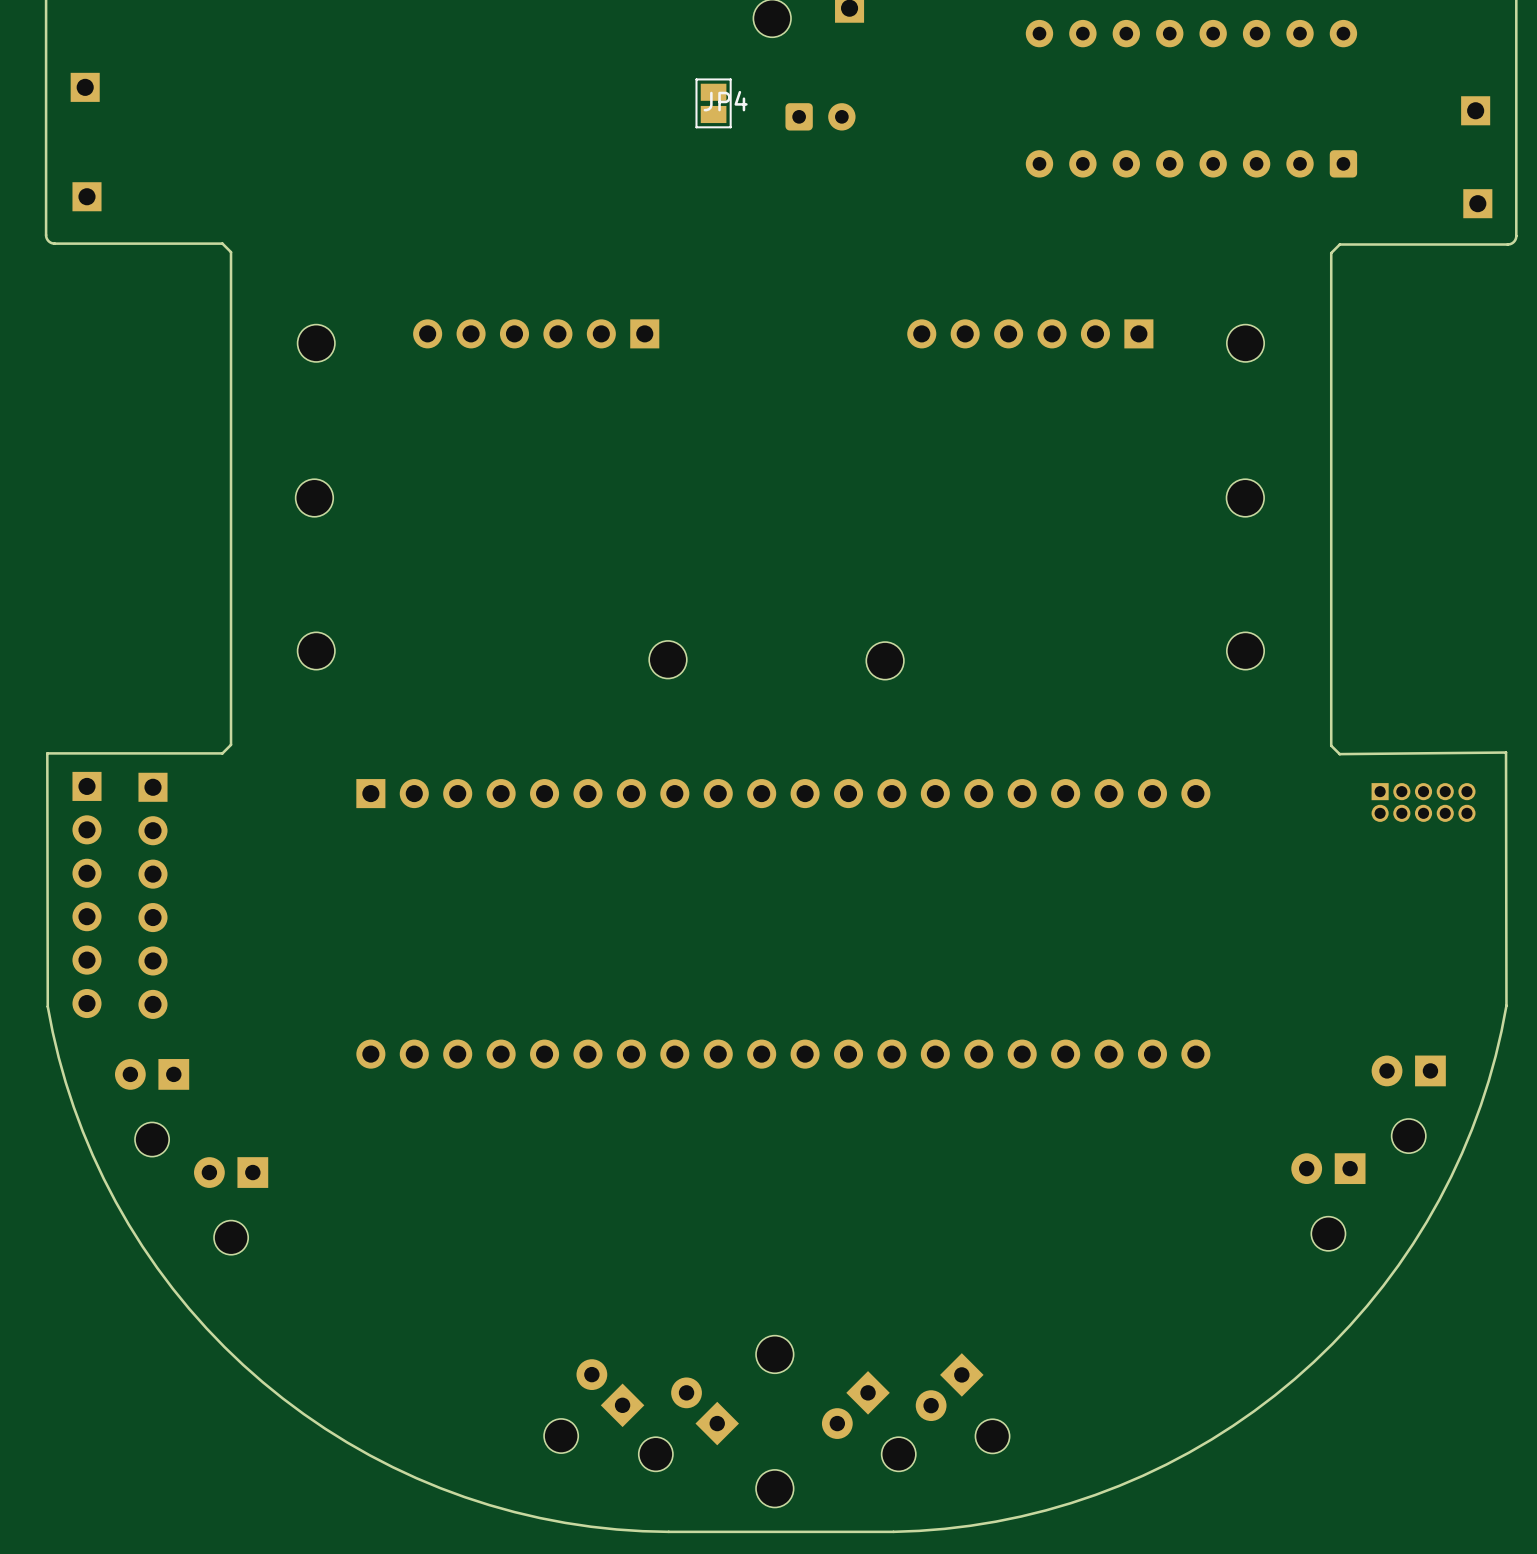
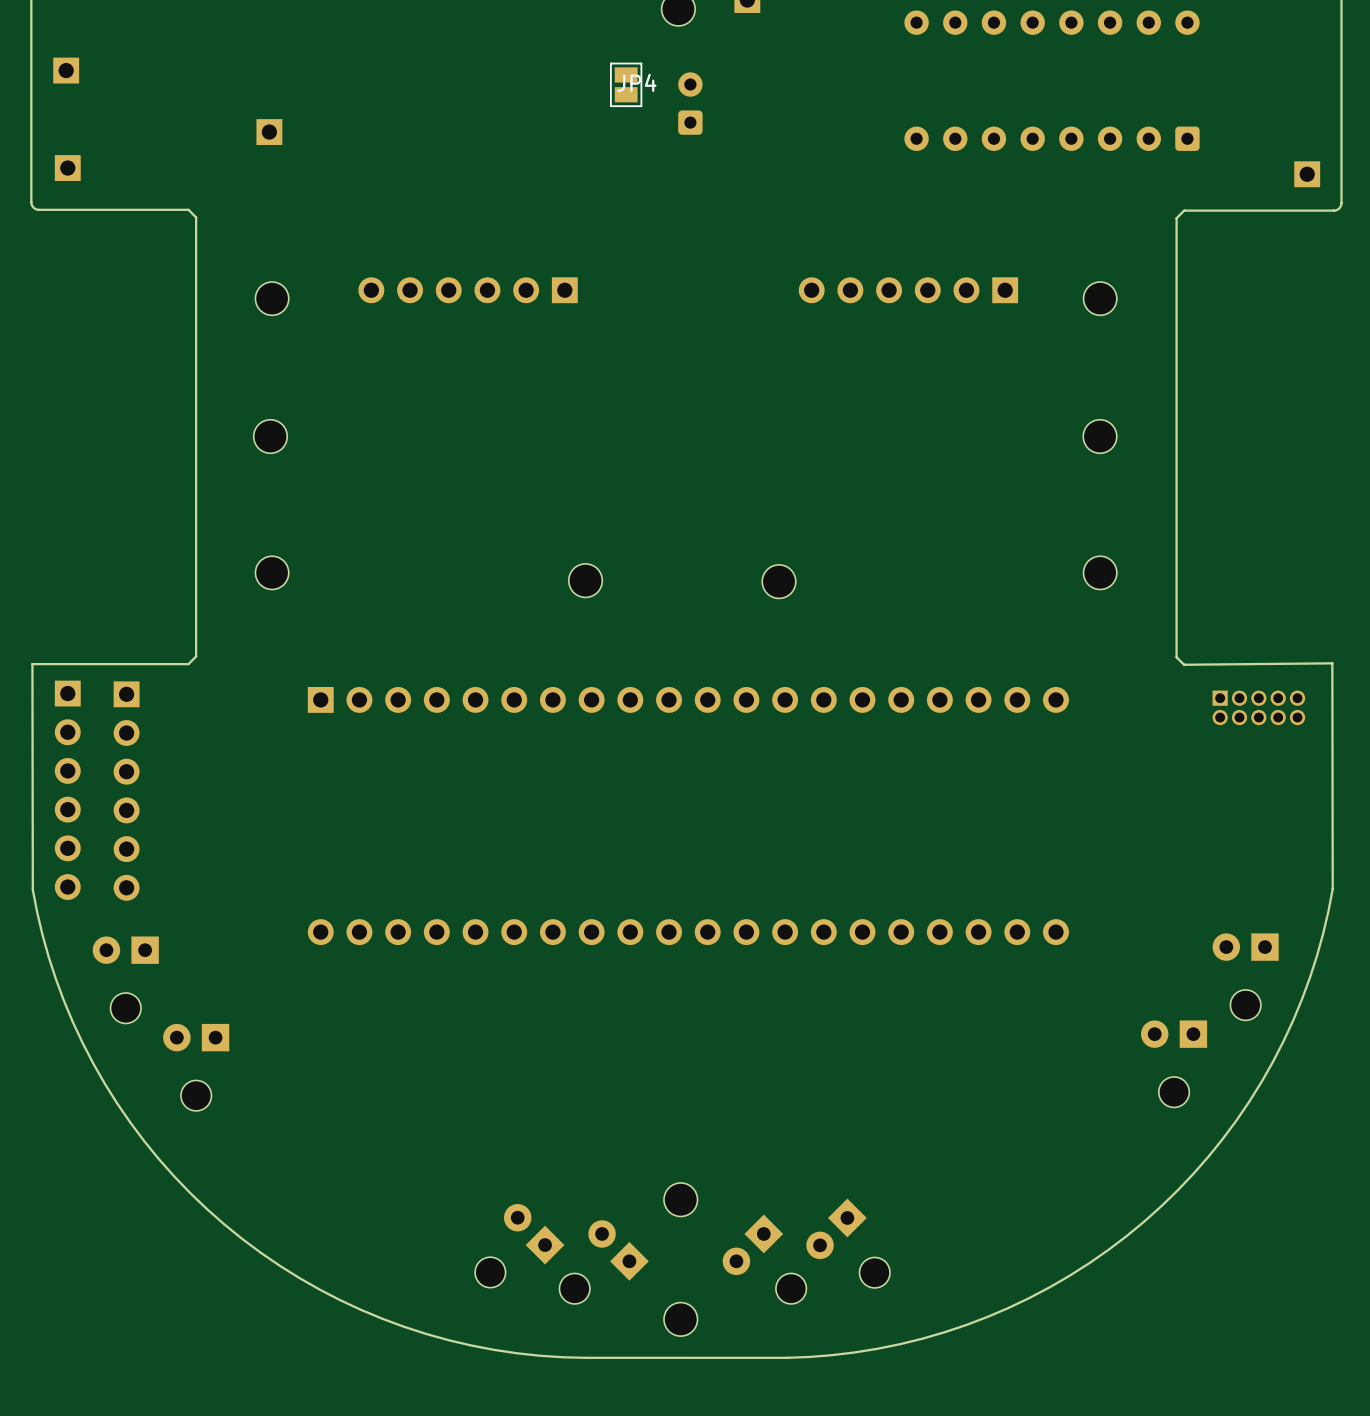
part: (1475, 110) -> none
part rotation: 0° (820, 116) -> 90° counterclockwise (690, 103)
part: none -> (269, 132)

